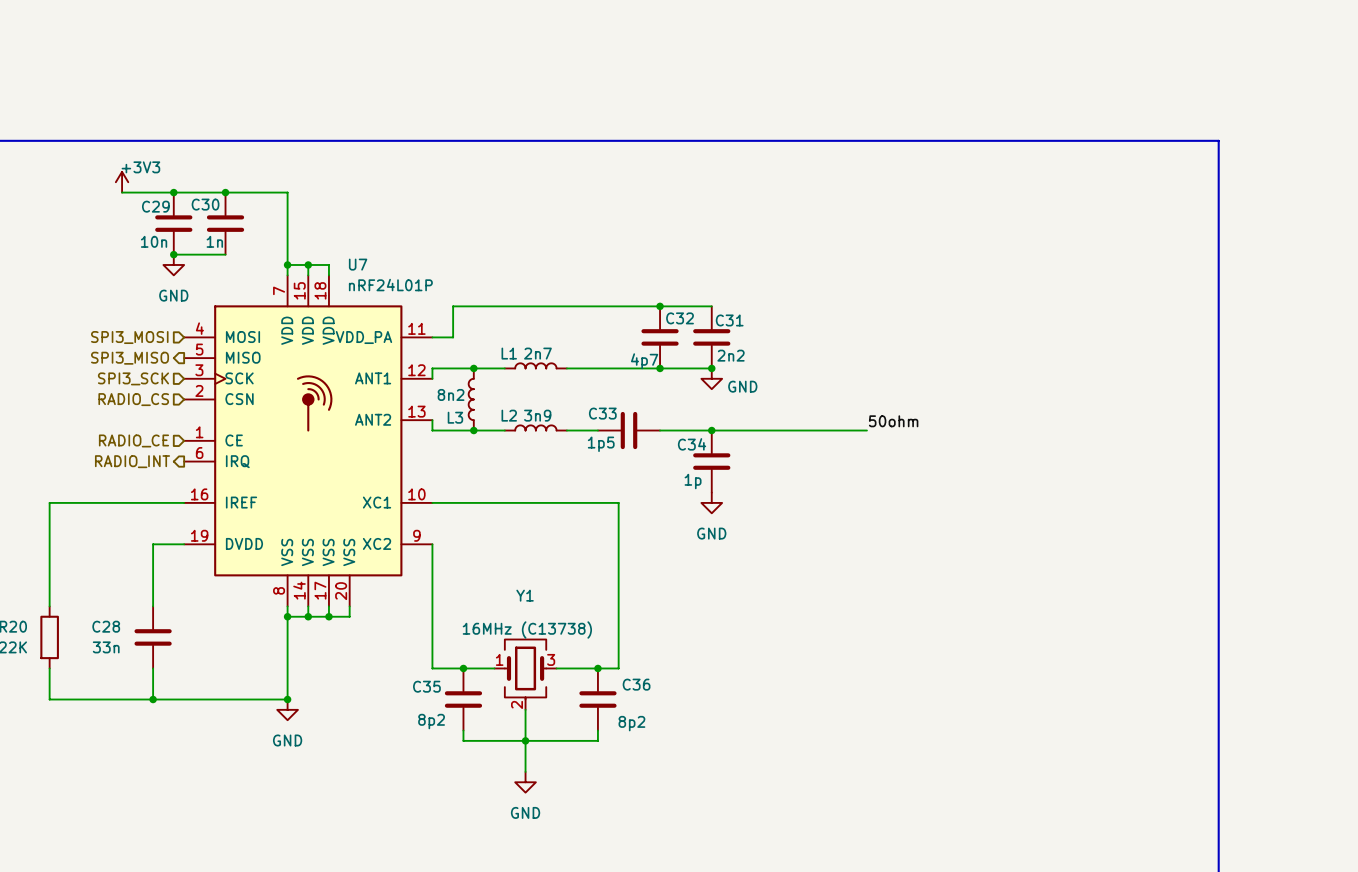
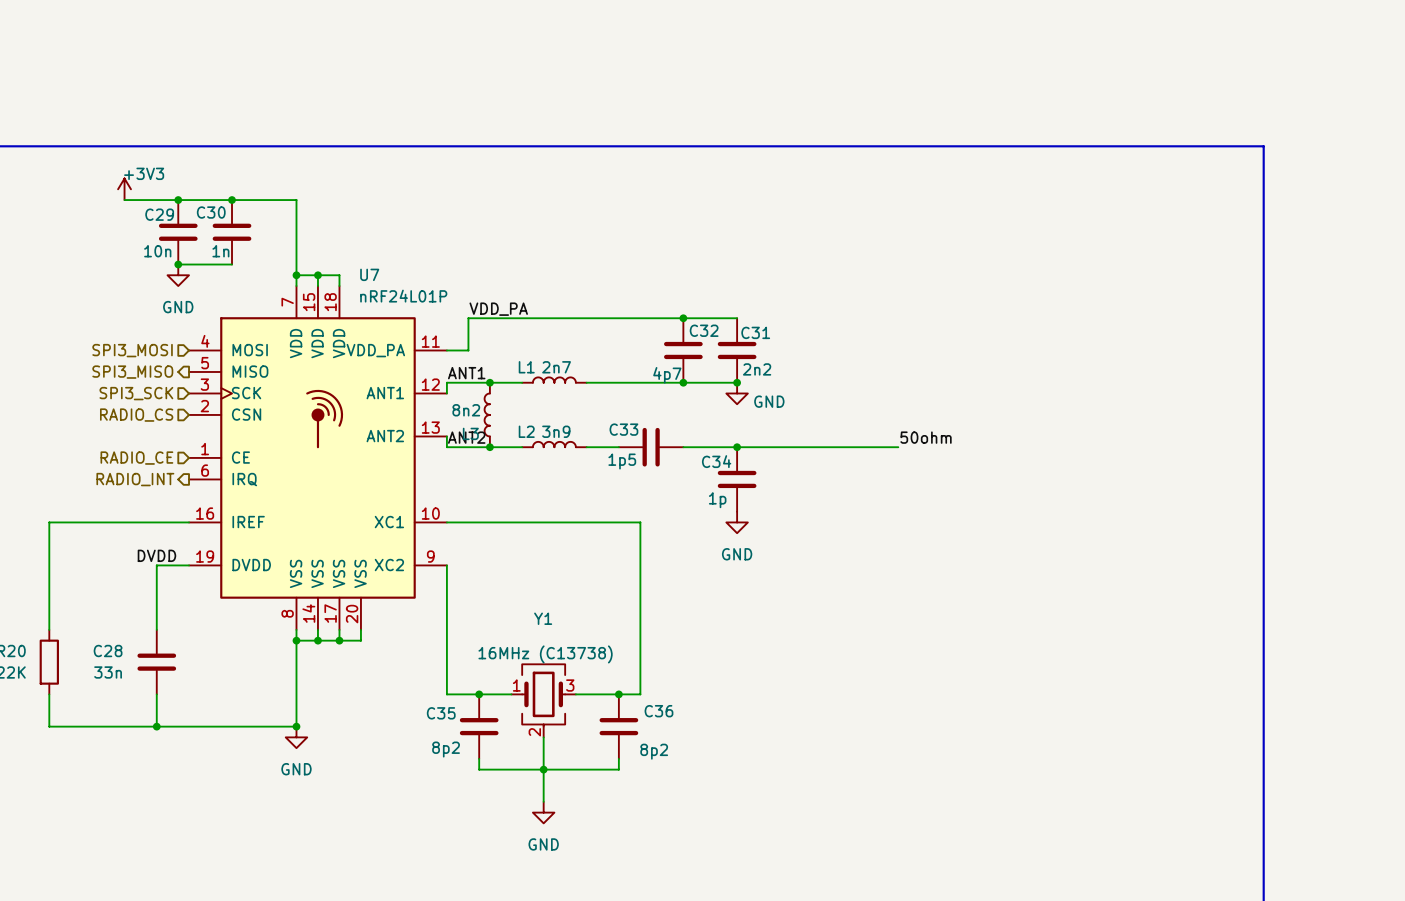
label: none -> VDD_PA (498, 309)
label: none -> ANT1 (466, 373)
label: none -> ANT2 (466, 437)
label: none -> DVDD (156, 555)

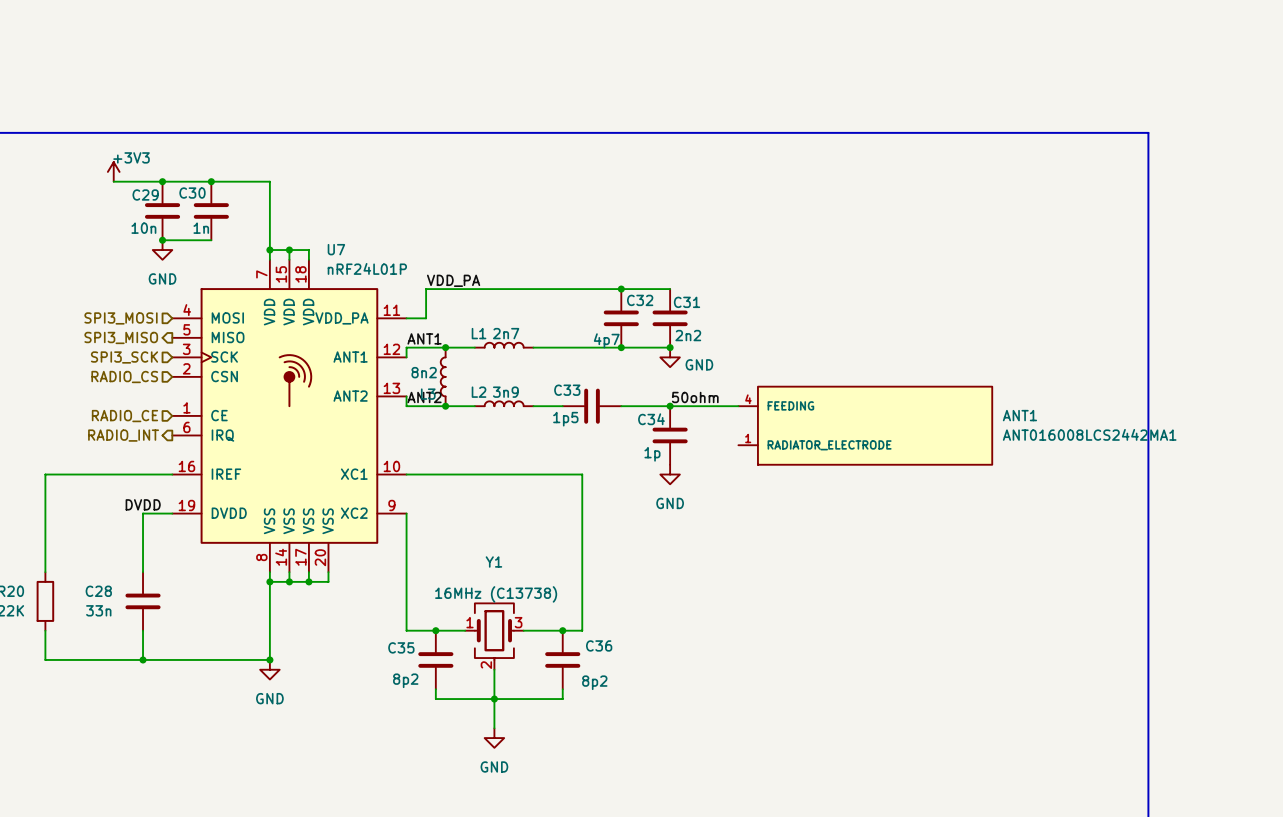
label position: 50ohm (926, 437) -> 50ohm (695, 397)
ANT1: none -> ANT016008LCS2442MA1 (865, 425)

